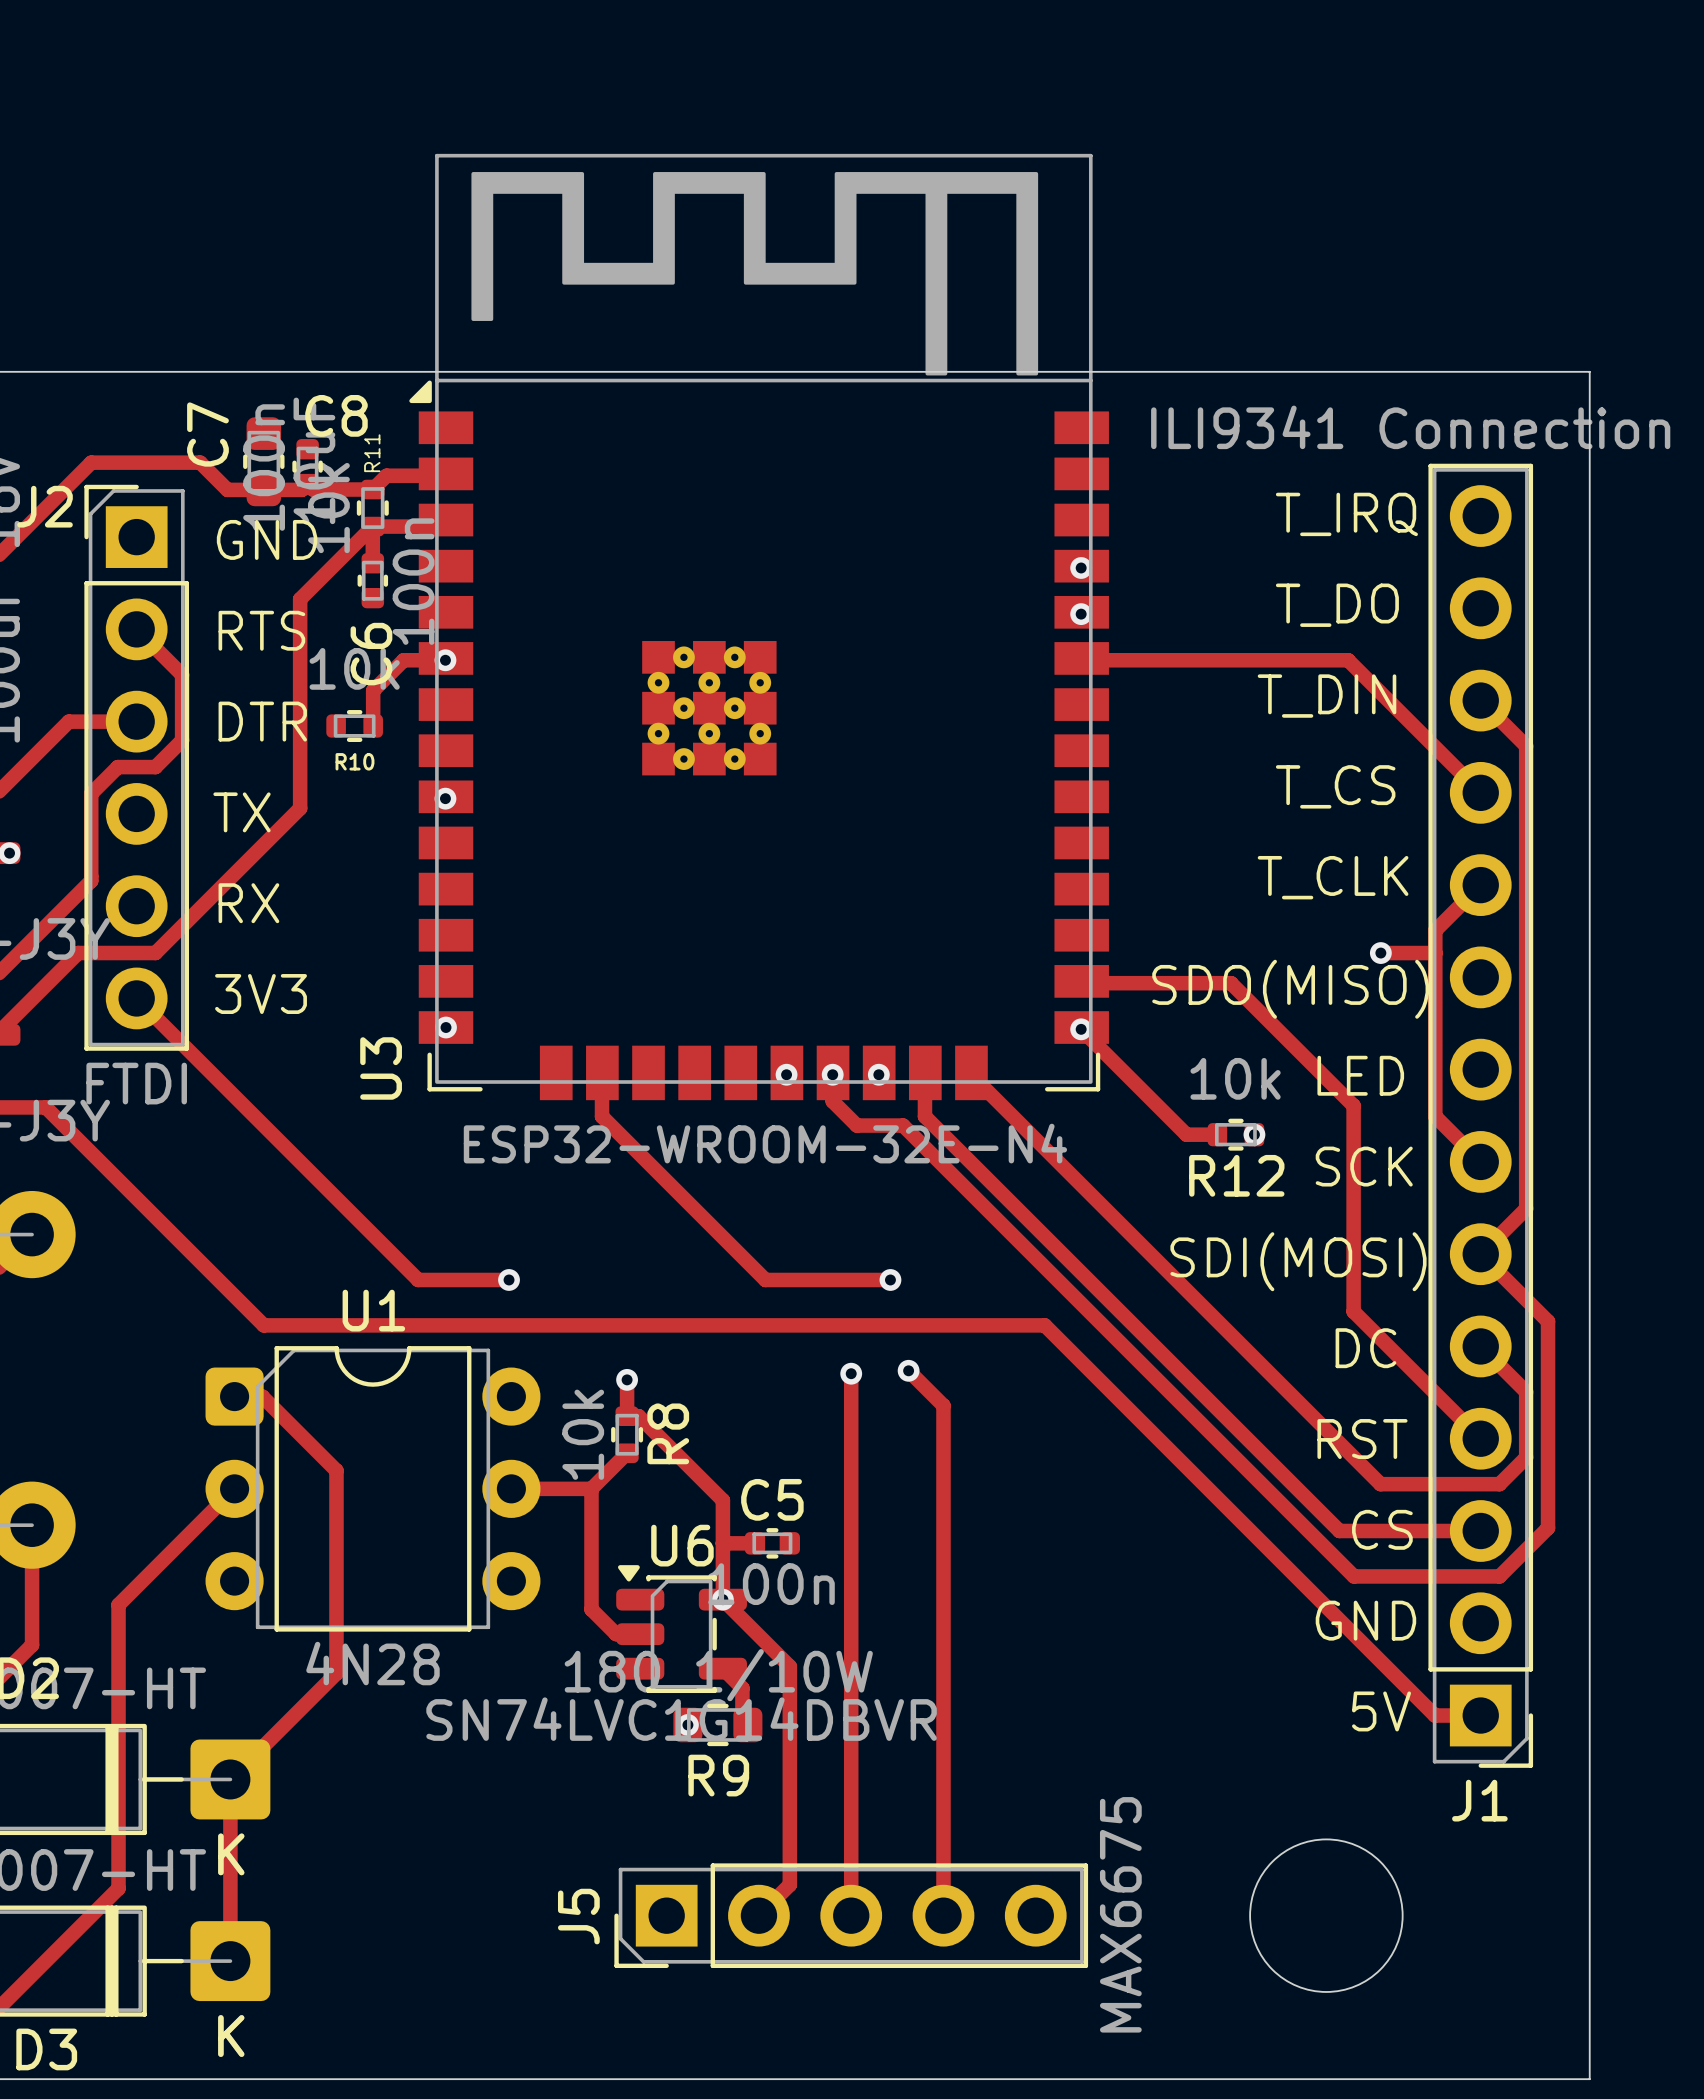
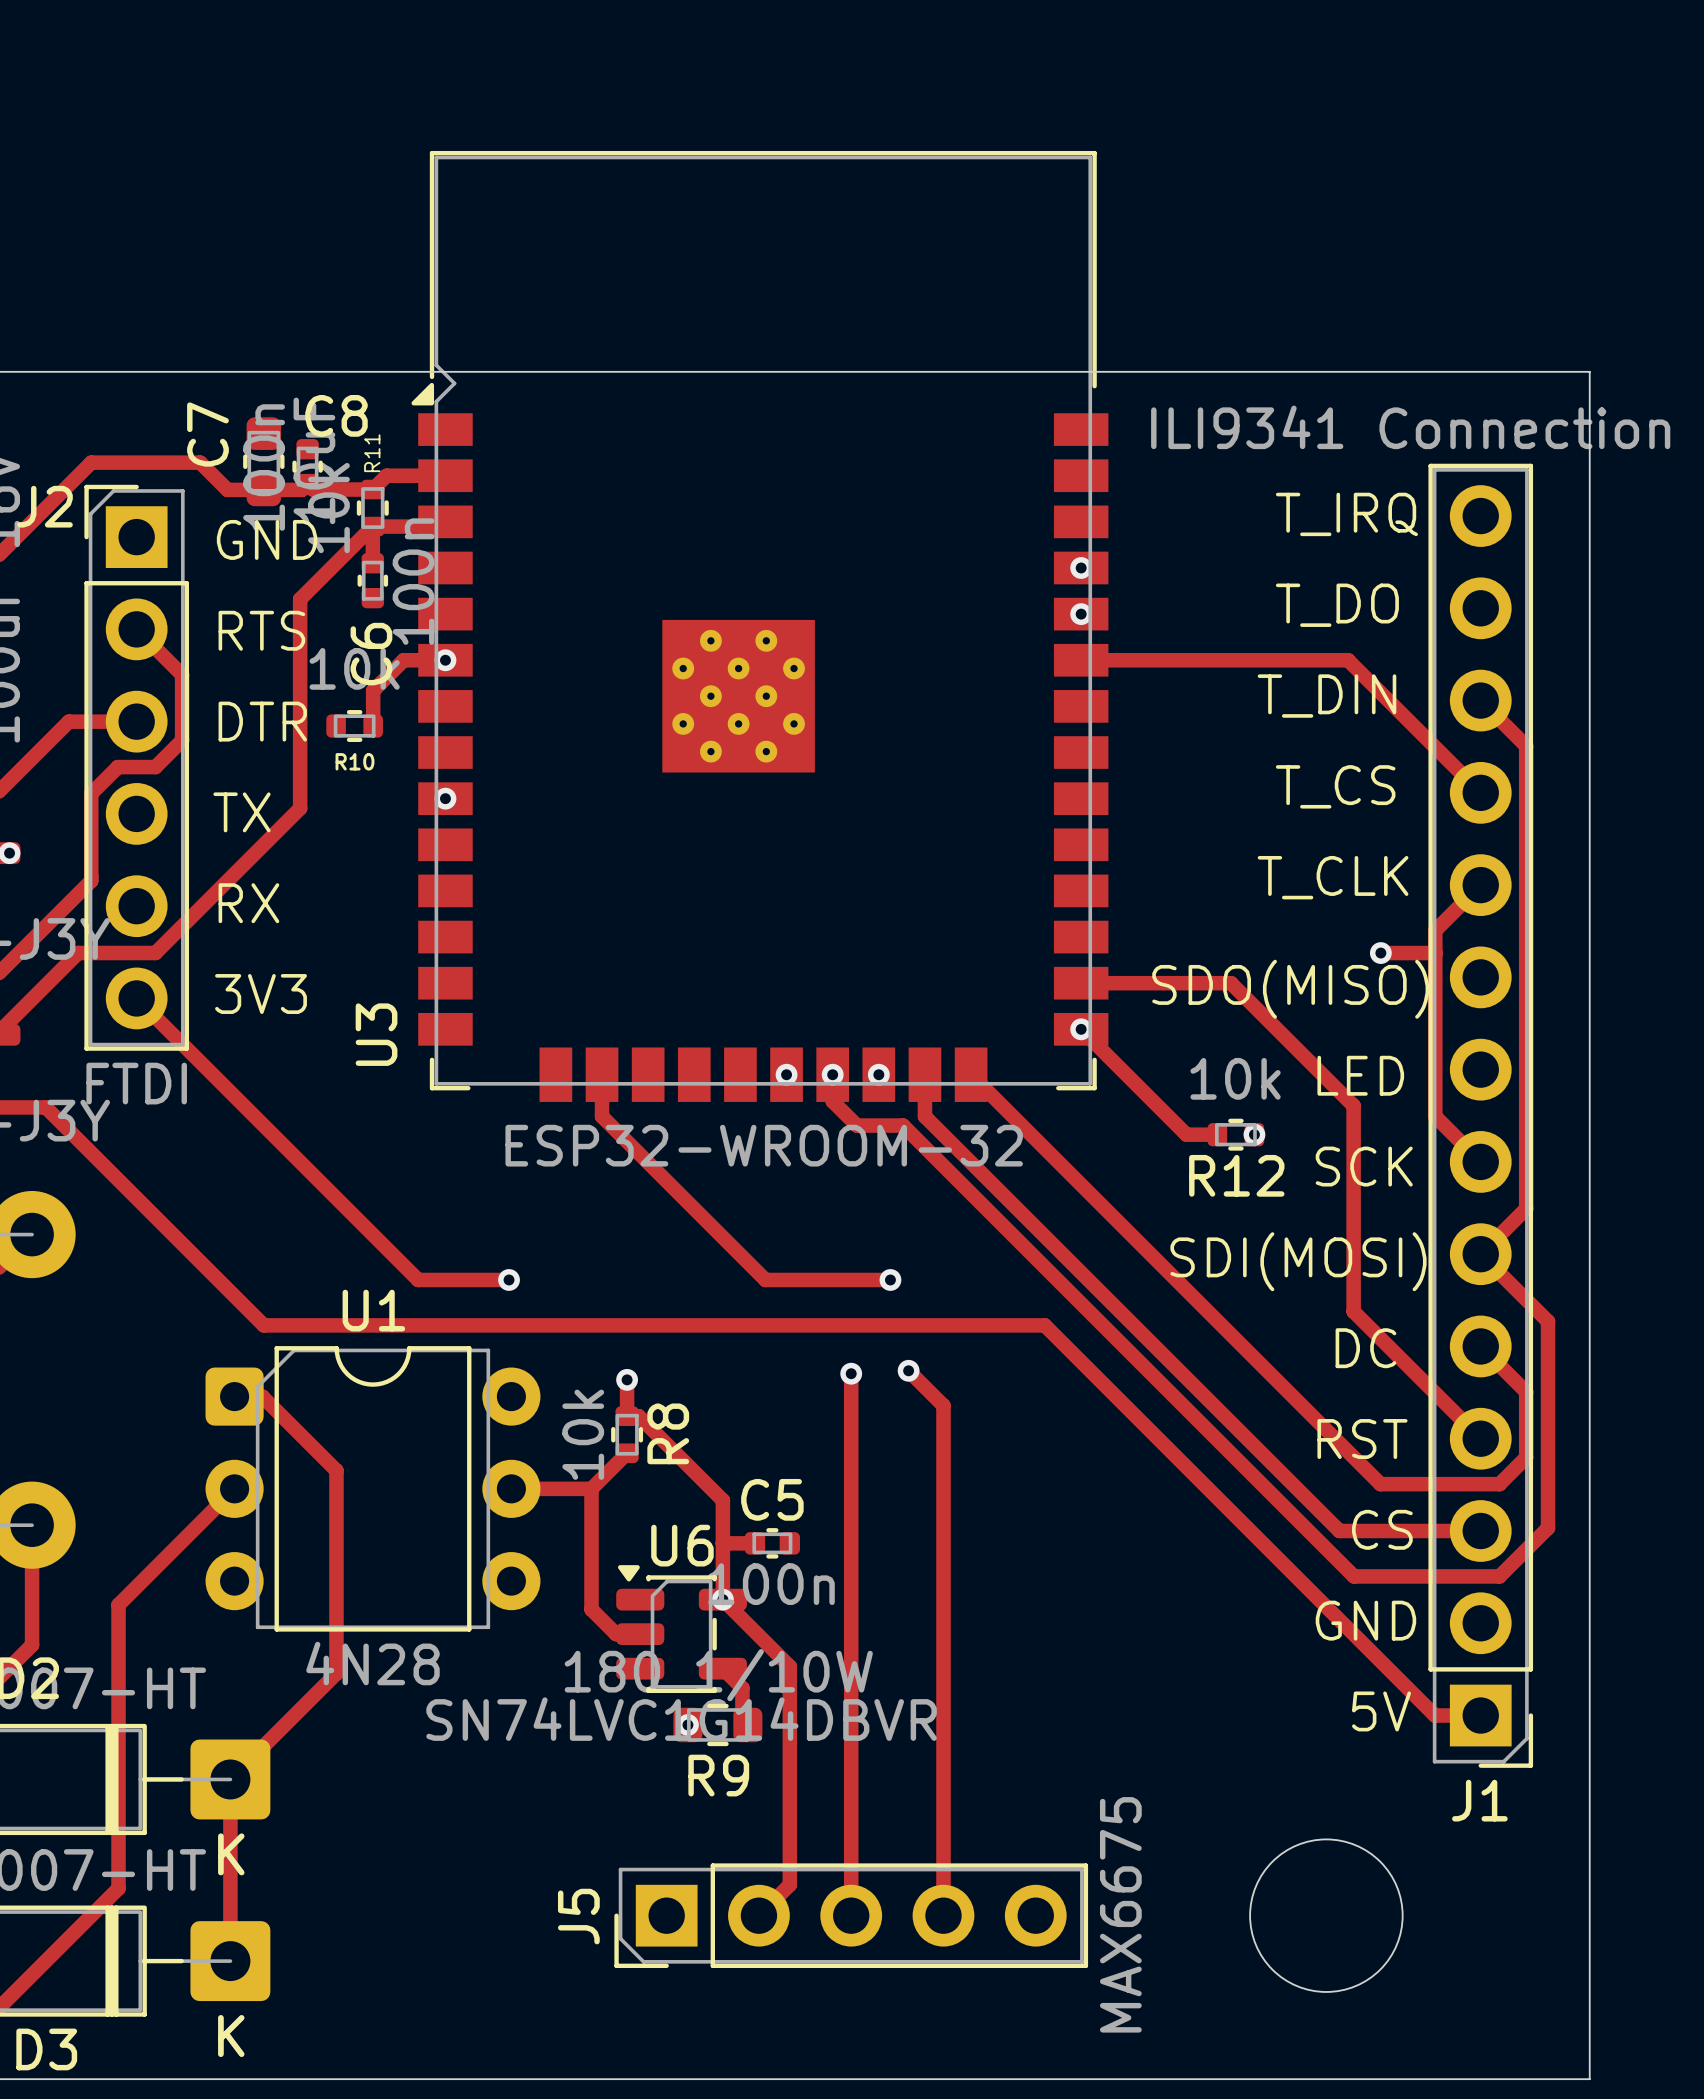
U3 footprint: [409, 153, 1109, 1101] -> [411, 150, 1109, 1102]
via: (446, 1027) -> none
U3 value: ESP32-WROOM-32E-N4 (765, 1143) -> ESP32-WROOM-32 (764, 1145)

